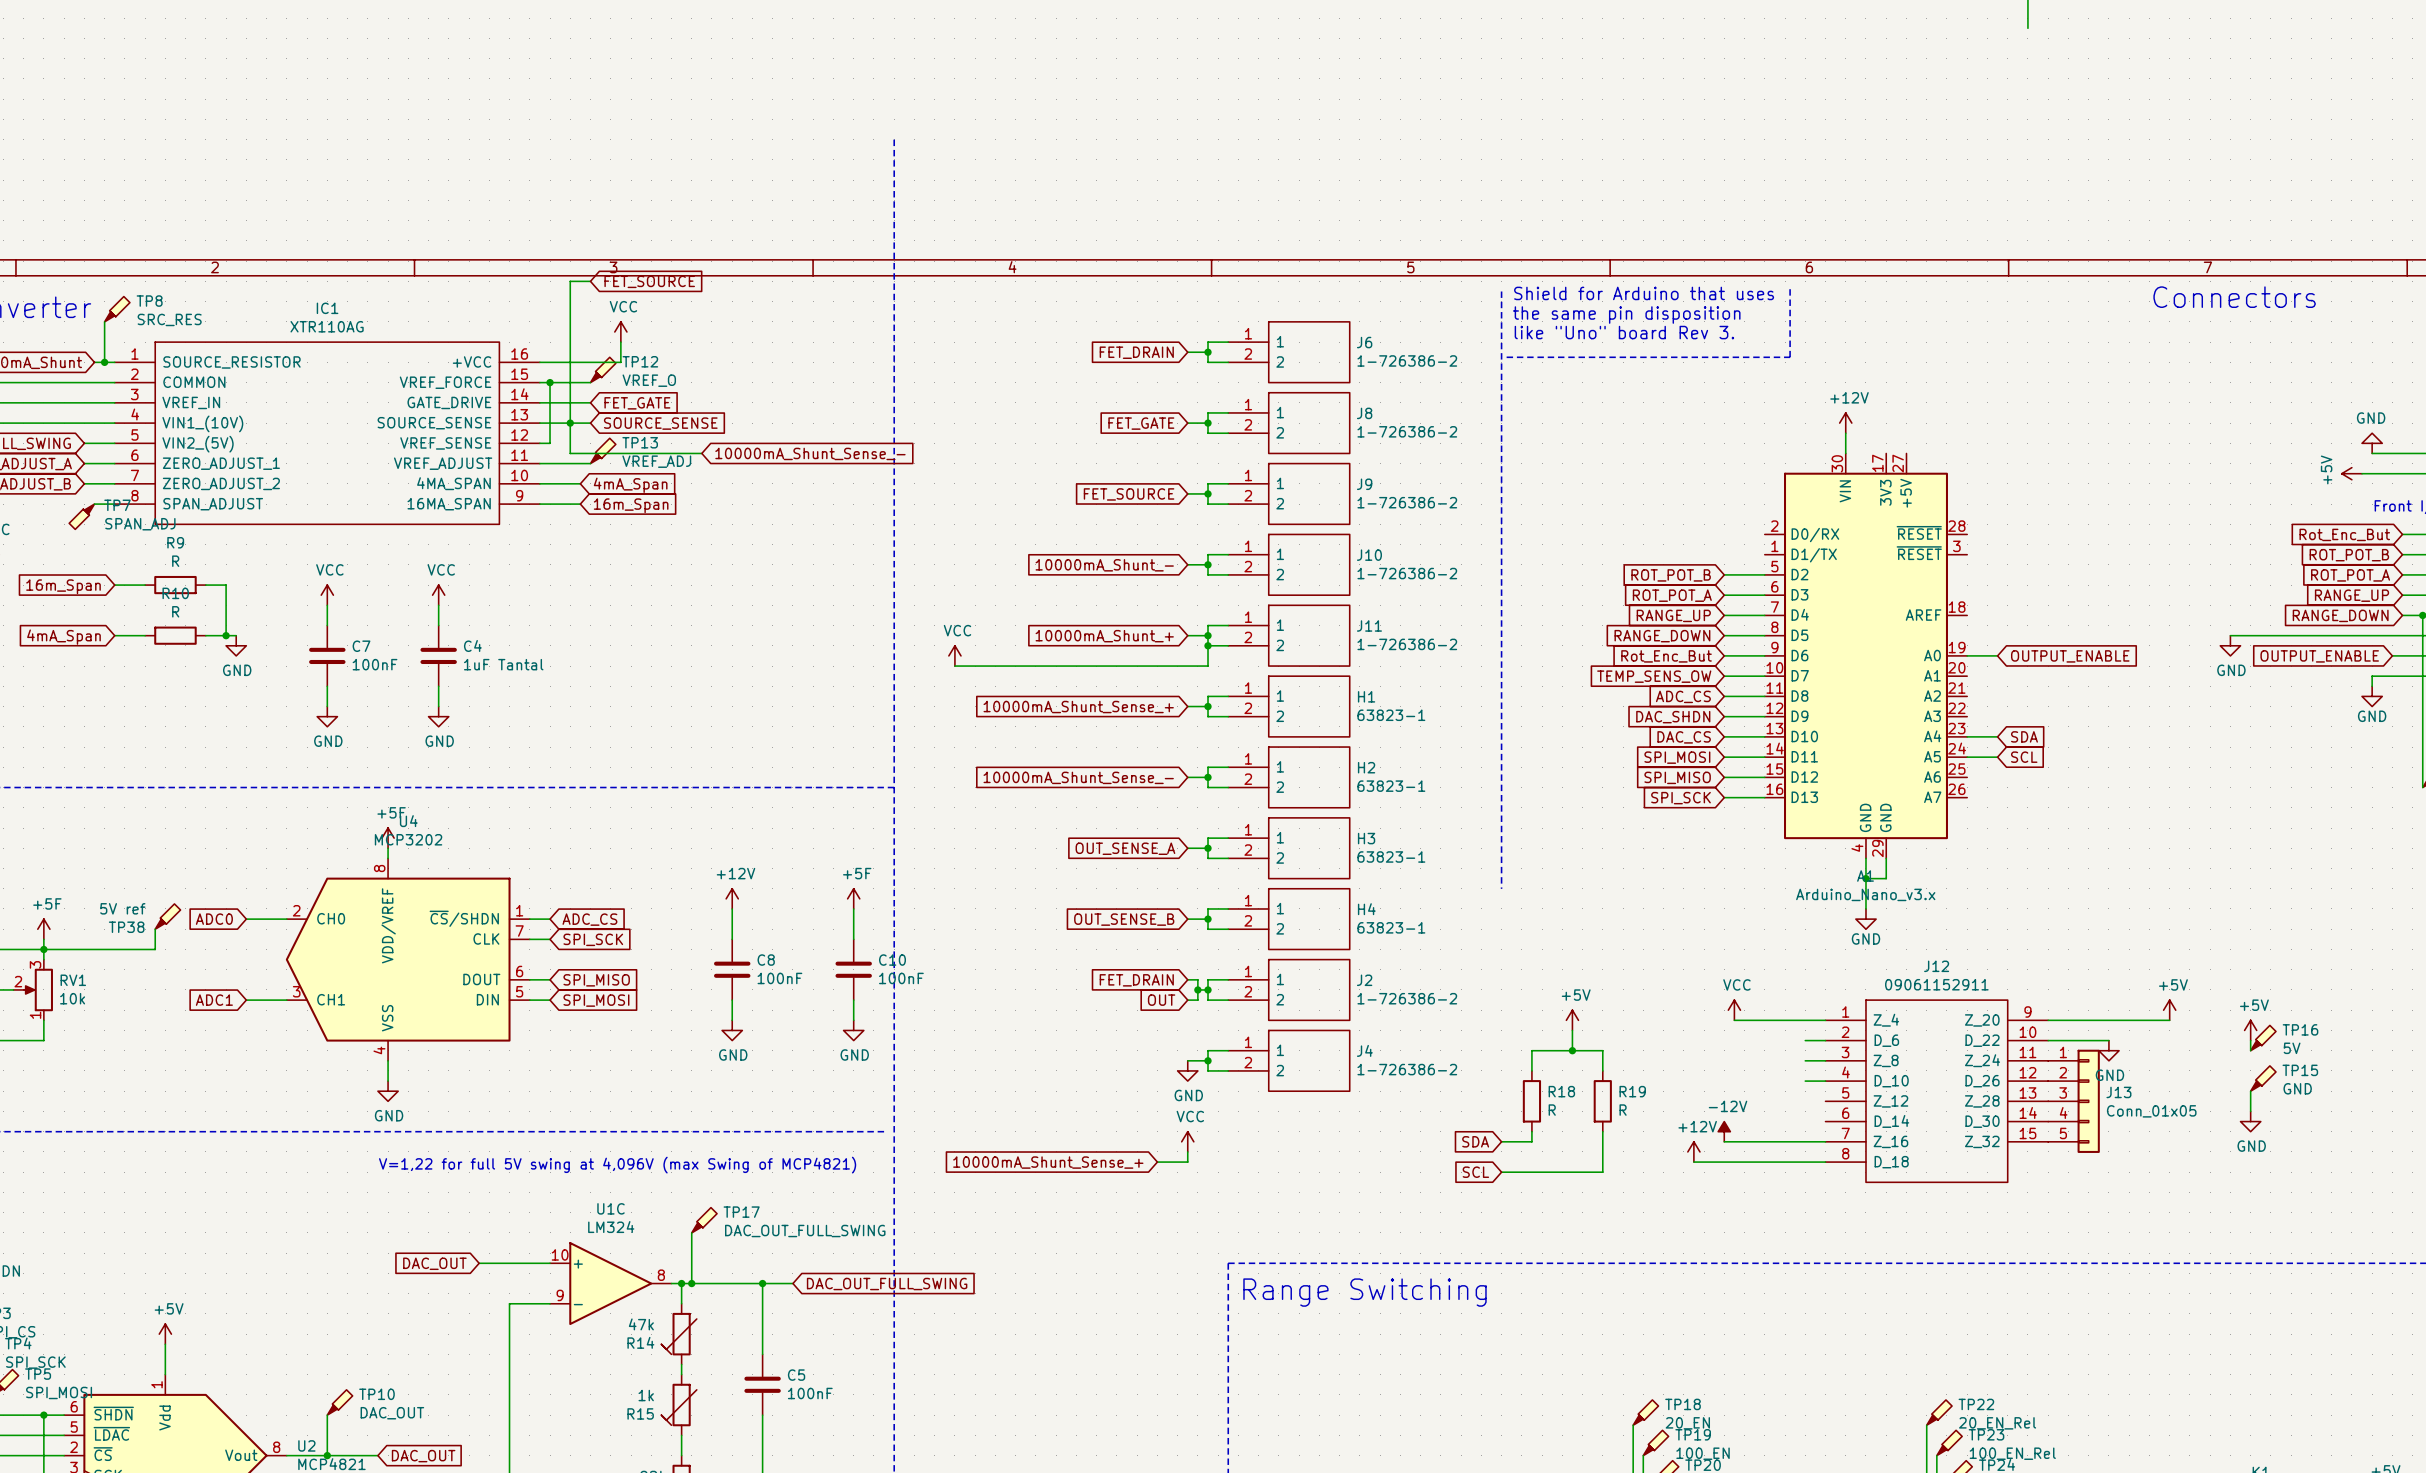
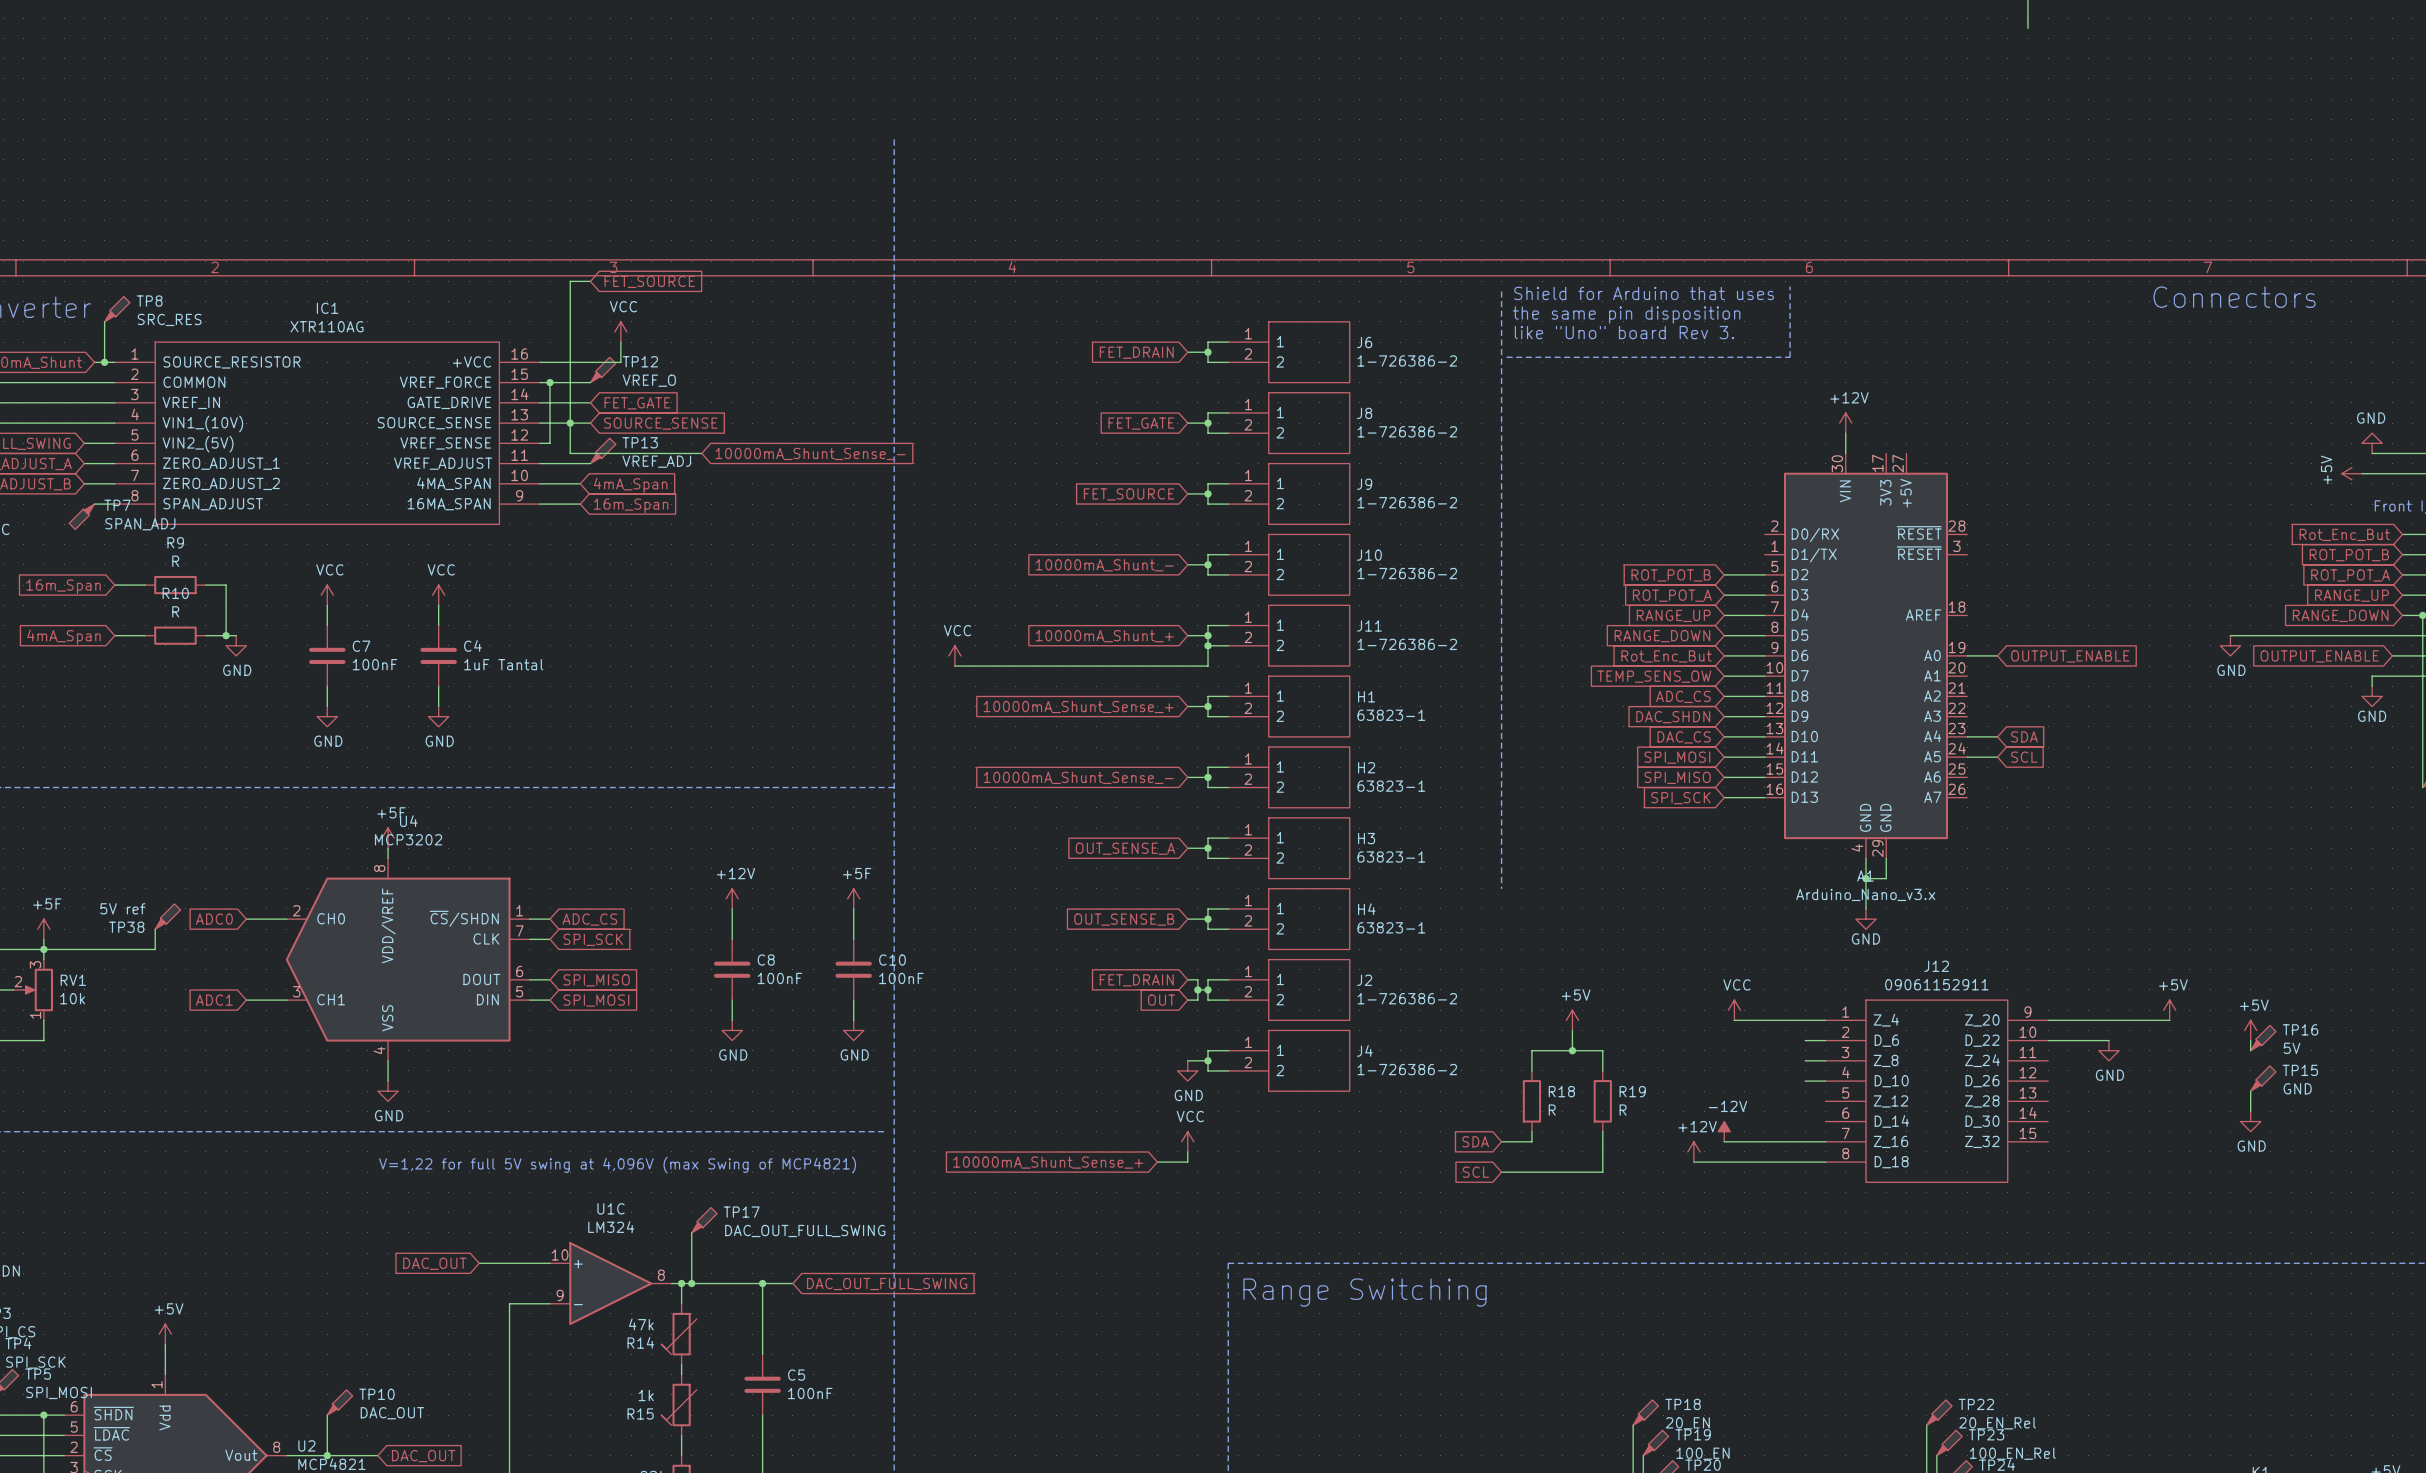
J13: Conn_01x05 (2074, 1101) -> none

